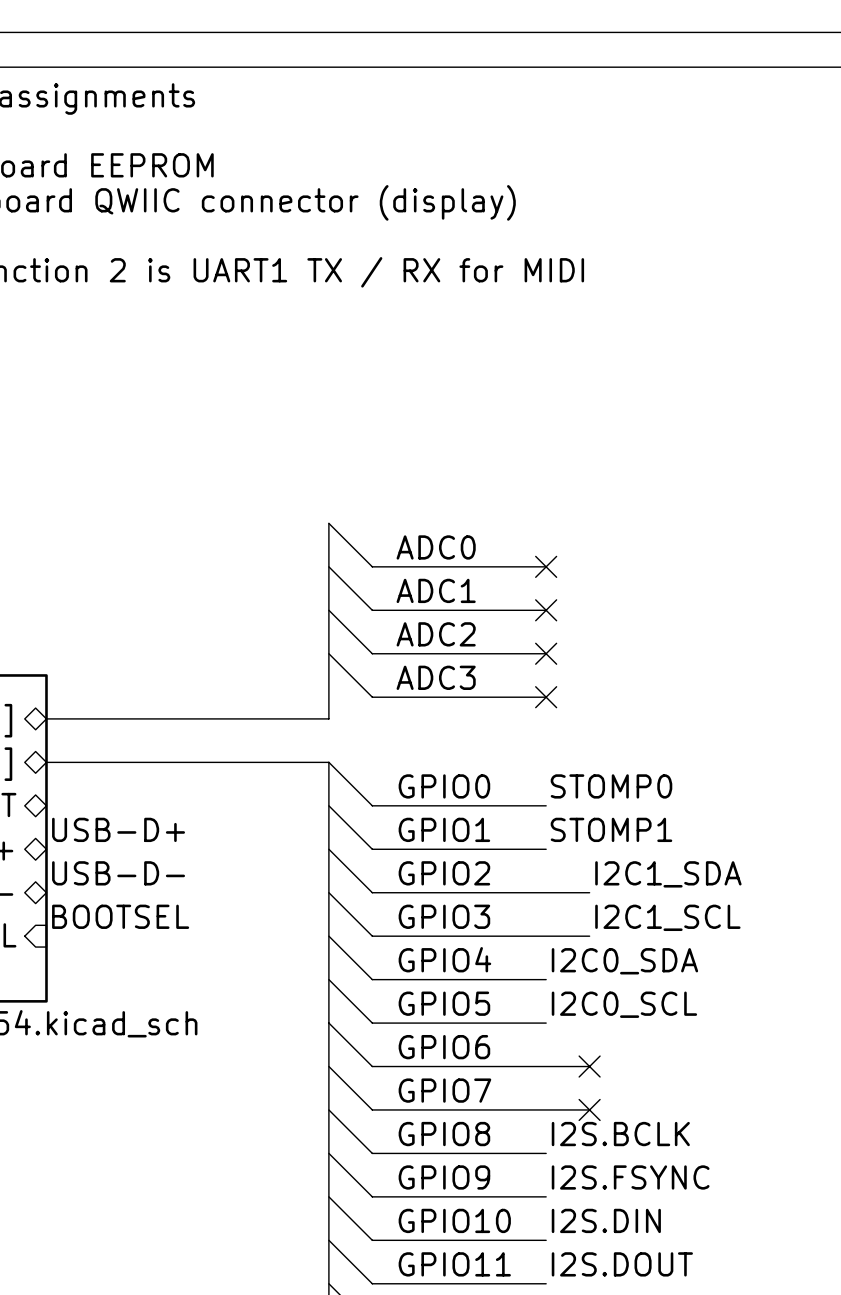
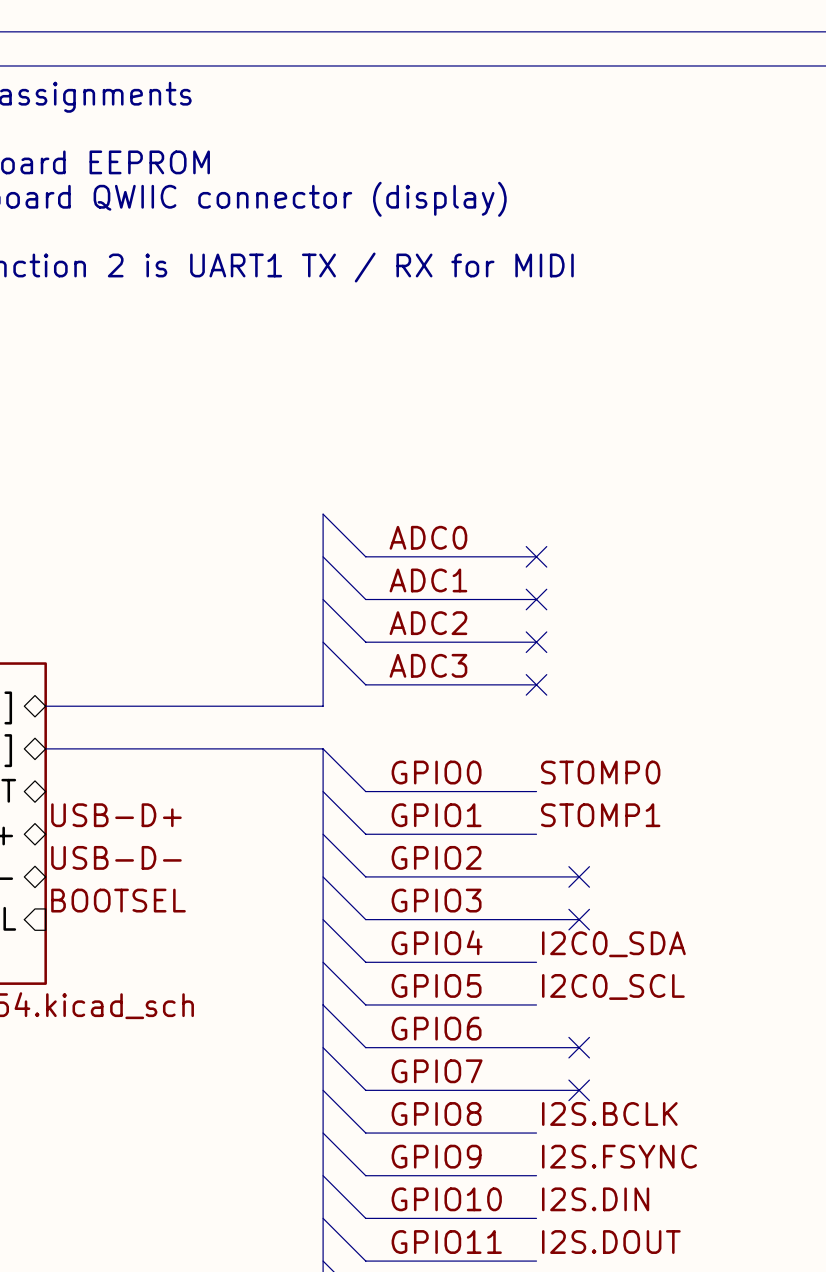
label: I2C1_SDA (668, 874) -> none
no-connect mark: none -> (579, 876)
label: I2C1_SCL (667, 917) -> none
no-connect mark: none -> (579, 919)

